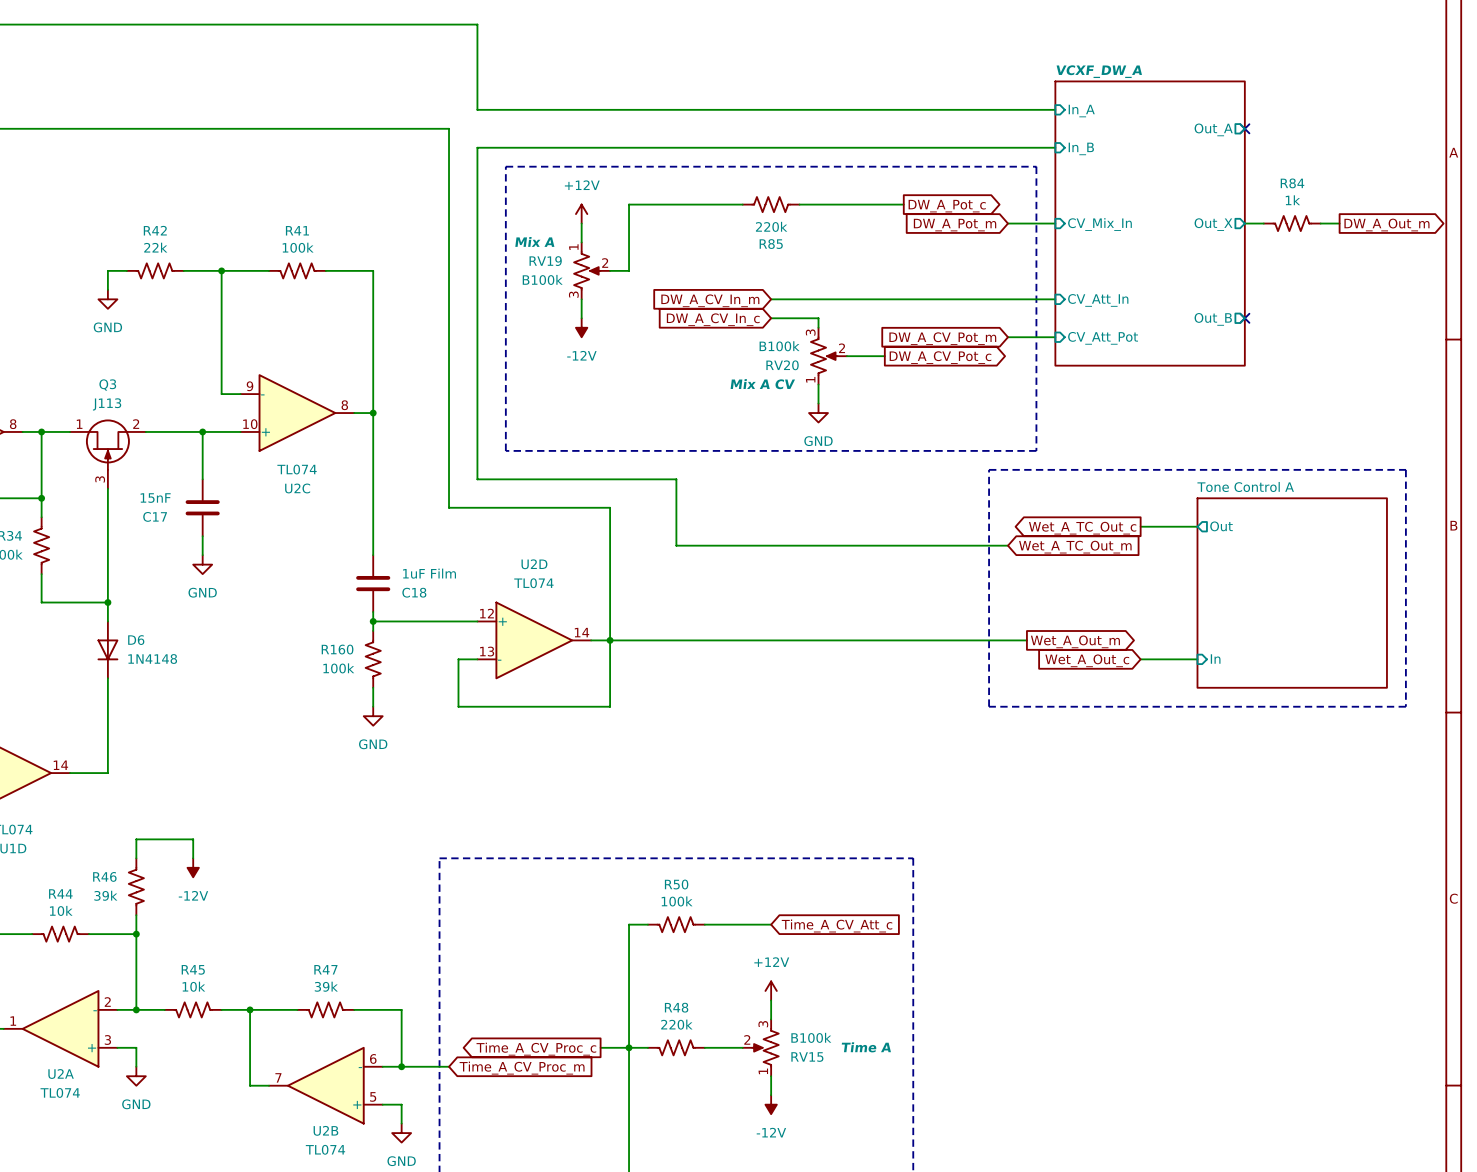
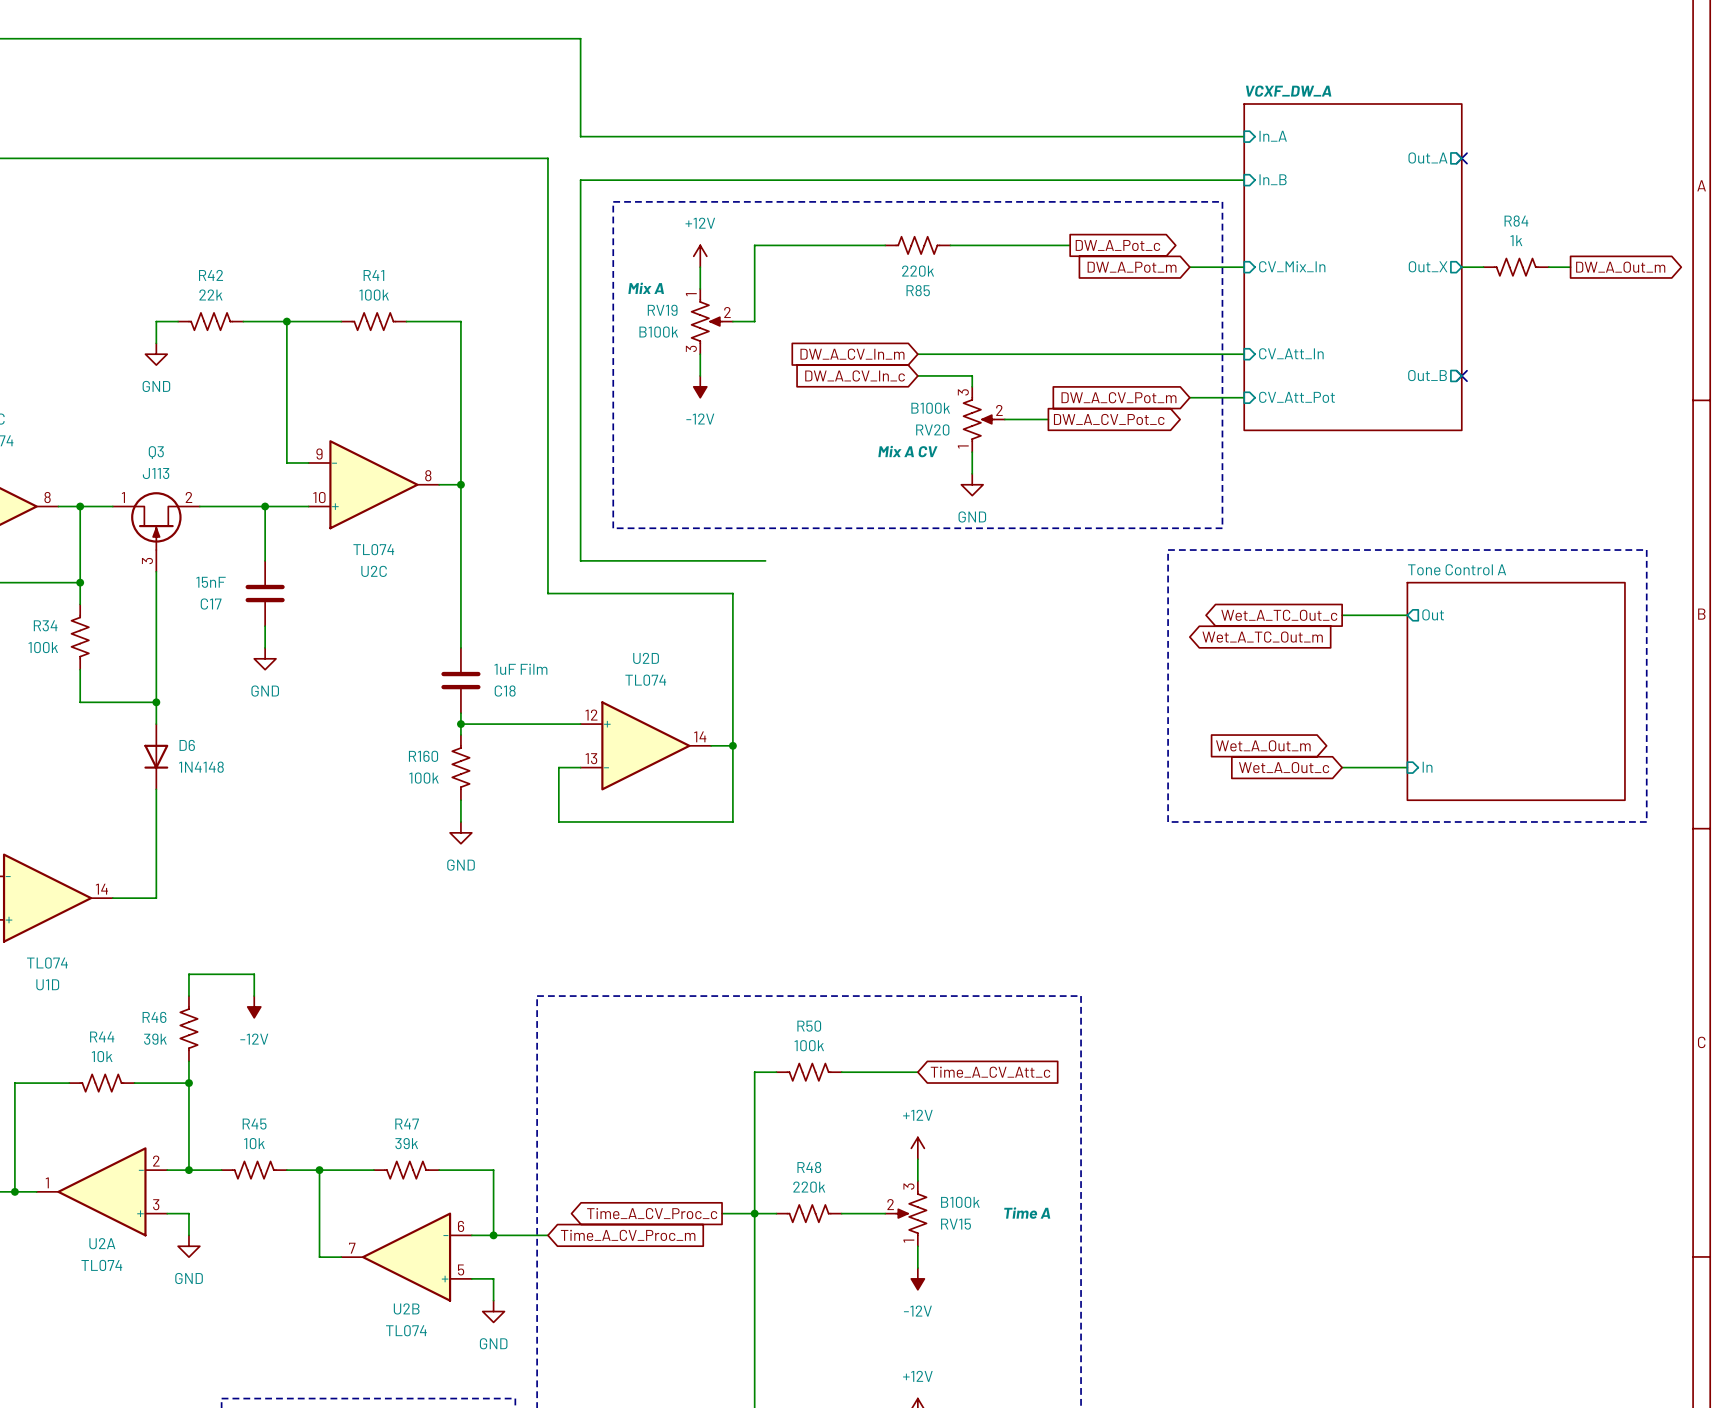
wire: (638, 479) (676, 479) (676, 545) (1008, 545) -> none
wire: (610, 640) (1026, 640) -> none

